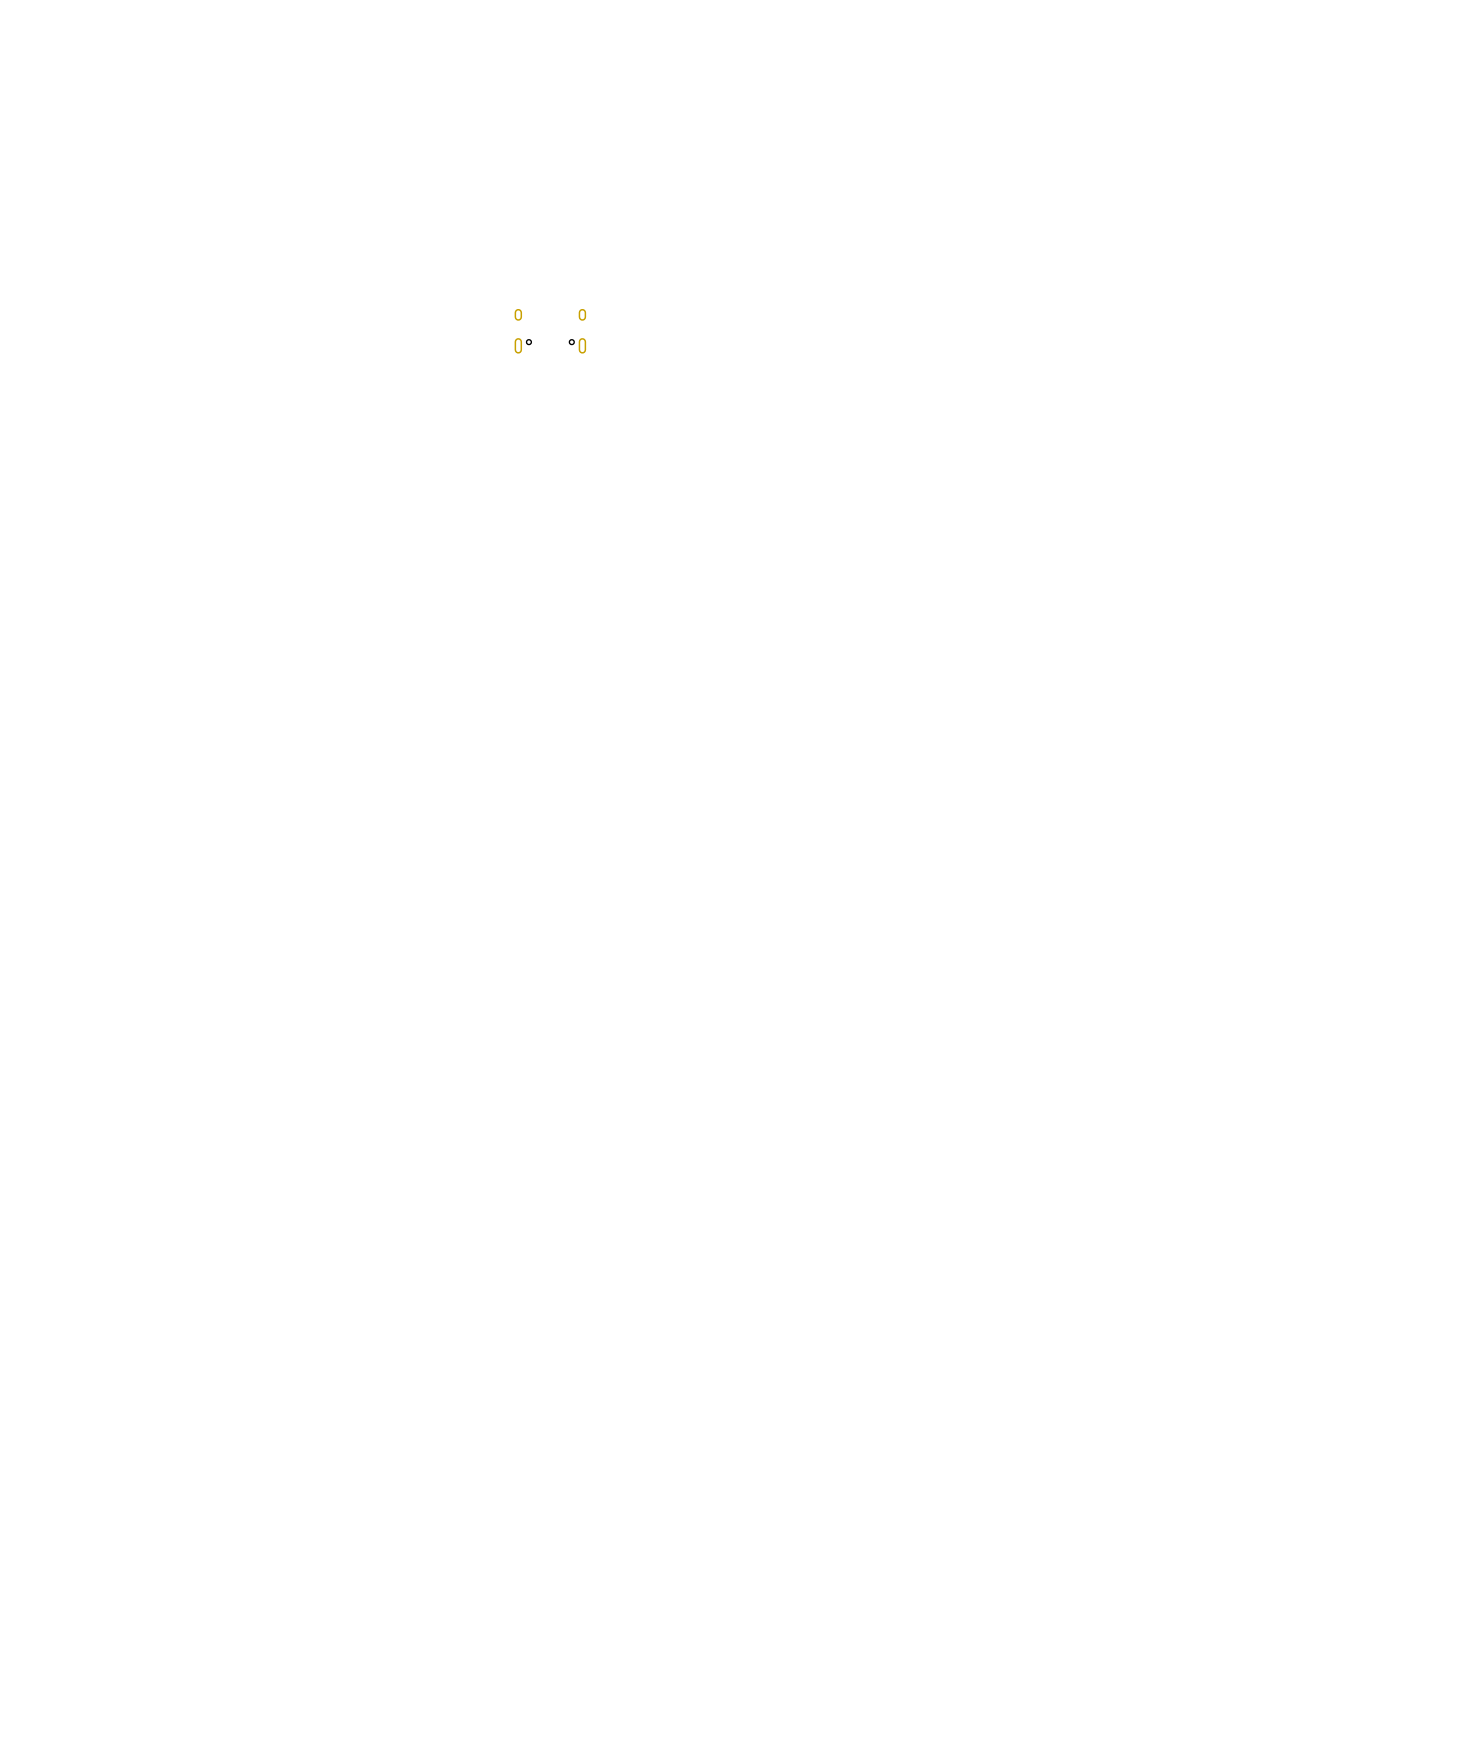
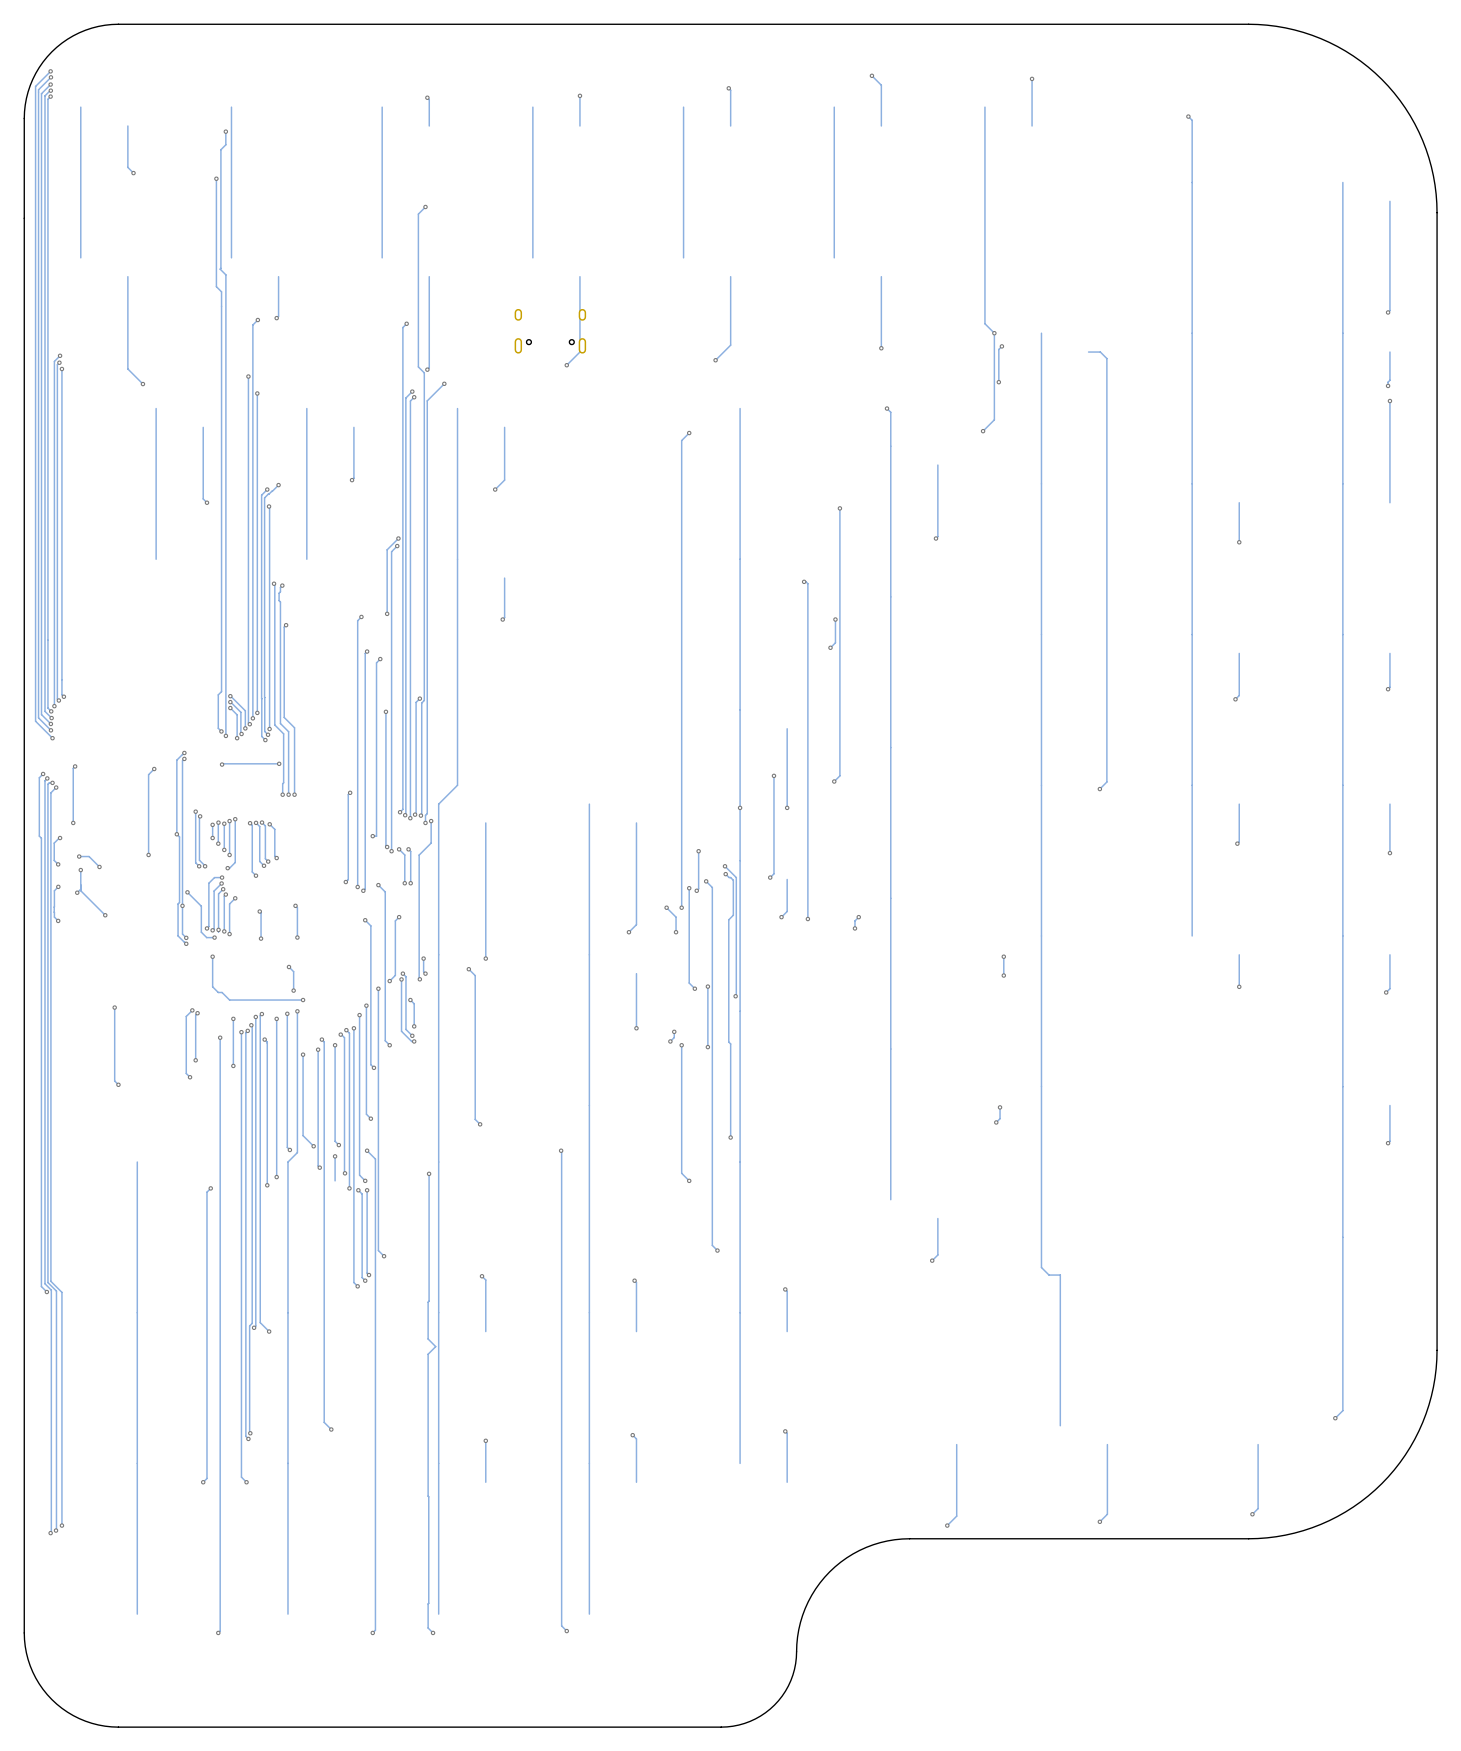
board edge: none -> (1248, 24) (118, 24) (98, 26) (79, 32) (56, 47) (43, 62) (30, 85) (24, 118) (24, 1632) (28, 1659) (35, 1678) (47, 1694) (62, 1708) (85, 1721) (118, 1727) (733, 1726) (760, 1716) (782, 1696) (792, 1675) (800, 1622) (811, 1595) (835, 1566) (866, 1547) (887, 1540) (909, 1538) (1248, 1538) (1276, 1536) (1312, 1527) (1345, 1511) (1375, 1489) (1399, 1462) (1414, 1439) (1426, 1413) (1433, 1387) (1436, 1359) (1436, 194) (1428, 157) (1414, 123) (1394, 93) (1375, 73) (1353, 56) (1320, 38) (1285, 27) (1248, 24)
track: none -> (50, 71) (35, 86) (35, 721) (52, 738)
via: none -> (50, 71)
track: none -> (871, 75) (881, 85) (881, 125)
via: none -> (871, 75)
track: none -> (50, 77) (38, 89) (38, 717) (50, 730)
via: none -> (50, 77)
track: none -> (1032, 78) (1032, 125)
via: none -> (1032, 78)
track: none -> (50, 84) (41, 93) (41, 714) (50, 723)
via: none -> (50, 84)
track: none -> (728, 88) (730, 90) (730, 125)
via: none -> (728, 88)
track: none -> (50, 90) (44, 95) (44, 711) (51, 718)
via: none -> (50, 90)
track: none -> (579, 95) (579, 125)
via: none -> (579, 95)
track: none -> (50, 96) (47, 99) (47, 708) (51, 711)
via: none -> (50, 96)
track: none -> (427, 97) (429, 99) (429, 125)
via: none -> (427, 97)
track: none -> (80, 107) (80, 257)
track: none -> (231, 107) (231, 257)
track: none -> (382, 107) (382, 257)
track: none -> (532, 107) (532, 257)
track: none -> (683, 107) (683, 257)
track: none -> (834, 107) (834, 257)
track: none -> (984, 107) (984, 323) (994, 333) (994, 419) (983, 431)
track: none -> (1188, 116) (1192, 120) (1192, 935)
via: none -> (1188, 116)
track: none -> (127, 125) (127, 167) (133, 173)
track: none -> (225, 131) (225, 144) (220, 149) (220, 269) (225, 274) (225, 735)
via: none -> (225, 131)
via: none -> (133, 173)
track: none -> (216, 178) (216, 286) (221, 291) (221, 691) (218, 694) (218, 728) (221, 731)
via: none -> (216, 178)
track: none -> (1342, 182) (1342, 1410) (1335, 1418)
track: none -> (1389, 201) (1389, 310) (1388, 312)
track: none -> (425, 206) (418, 214) (418, 366) (424, 372) (424, 700) (421, 703) (420, 815)
via: none -> (425, 206)
track: none -> (127, 276) (127, 368) (142, 384)
track: none -> (278, 276) (278, 316) (276, 318)
track: none -> (429, 276) (429, 367) (427, 369)
track: none -> (579, 276) (579, 352) (566, 365)
track: none -> (730, 276) (730, 345) (715, 360)
track: none -> (881, 276) (881, 348)
via: none -> (1388, 312)
via: none -> (276, 318)
track: none -> (257, 320) (252, 324) (252, 718)
via: none -> (257, 320)
track: none -> (406, 323) (402, 327) (402, 809) (400, 812)
via: none -> (406, 323)
via: none -> (994, 333)
track: none -> (1041, 333) (1041, 1267) (1049, 1275) (1060, 1275) (1060, 1425)
track: none -> (1001, 346) (998, 349) (998, 382)
via: none -> (1001, 346)
via: none -> (881, 348)
track: none -> (1088, 352) (1100, 352) (1106, 358) (1106, 782) (1099, 789)
track: none -> (1389, 352) (1389, 380) (1388, 385)
track: none -> (60, 355) (54, 361) (54, 706)
via: none -> (60, 355)
via: none -> (715, 360)
track: none -> (59, 362) (57, 364) (58, 700)
via: none -> (59, 362)
via: none -> (566, 365)
track: none -> (61, 368) (61, 694) (63, 696)
via: none -> (61, 368)
via: none -> (427, 369)
track: none -> (248, 376) (249, 724)
via: none -> (248, 376)
via: none -> (998, 382)
track: none -> (444, 383) (427, 400) (427, 813) (425, 822)
via: none -> (444, 383)
via: none -> (142, 384)
via: none -> (1388, 385)
track: none -> (412, 391) (405, 398) (405, 815)
via: none -> (412, 391)
track: none -> (257, 393) (257, 712)
via: none -> (257, 393)
track: none -> (414, 397) (410, 401) (410, 818)
via: none -> (414, 397)
track: none -> (1389, 401) (1389, 502)
via: none -> (1389, 401)
track: none -> (156, 408) (156, 559)
track: none -> (306, 408) (306, 559)
track: none -> (457, 408) (457, 785) (438, 804) (438, 1614)
track: none -> (740, 408) (740, 1463)
track: none -> (887, 408) (890, 412) (890, 1199)
via: none -> (887, 408)
track: none -> (203, 427) (203, 498) (206, 502)
track: none -> (353, 427) (353, 478) (352, 480)
track: none -> (504, 427) (504, 480) (495, 489)
via: none -> (983, 431)
track: none -> (689, 433) (681, 440) (681, 907)
via: none -> (689, 433)
track: none -> (937, 465) (937, 536) (935, 538)
via: none -> (352, 480)
track: none -> (278, 485) (264, 497) (264, 731) (268, 734)
via: none -> (278, 485)
track: none -> (267, 489) (261, 495) (261, 736) (265, 740)
via: none -> (267, 489)
via: none -> (495, 489)
via: none -> (206, 502)
track: none -> (1239, 502) (1239, 542)
track: none -> (269, 506) (269, 729)
via: none -> (269, 506)
track: none -> (839, 508) (839, 775) (834, 781)
via: none -> (839, 508)
track: none -> (398, 538) (387, 549) (387, 613)
via: none -> (398, 538)
via: none -> (935, 538)
via: none -> (1239, 542)
track: none -> (397, 546) (391, 551) (391, 851)
via: none -> (397, 546)
track: none -> (504, 578) (504, 617) (502, 619)
track: none -> (804, 581) (807, 583) (807, 919)
via: none -> (804, 581)
track: none -> (274, 583) (274, 725) (283, 733) (282, 794)
via: none -> (274, 583)
track: none -> (282, 585) (279, 593) (280, 723) (288, 731) (288, 794)
via: none -> (282, 585)
via: none -> (387, 613)
track: none -> (361, 616) (357, 620) (357, 887)
via: none -> (361, 616)
via: none -> (502, 619)
track: none -> (835, 619) (835, 642) (830, 647)
via: none -> (835, 619)
track: none -> (286, 625) (284, 627) (284, 717) (294, 727) (294, 794)
via: none -> (286, 625)
via: none -> (830, 647)
track: none -> (367, 651) (365, 653) (365, 888) (363, 890)
via: none -> (367, 651)
track: none -> (1239, 653) (1239, 695) (1235, 699)
track: none -> (1389, 653) (1389, 687) (1388, 689)
track: none -> (380, 659) (376, 662) (376, 836) (372, 836)
via: none -> (380, 659)
via: none -> (1388, 689)
via: none -> (63, 696)
track: none -> (230, 696) (245, 710) (245, 728)
via: none -> (230, 696)
track: none -> (419, 698) (416, 702) (415, 814)
via: none -> (419, 698)
via: none -> (1235, 699)
via: none -> (58, 700)
track: none -> (230, 702) (240, 712) (241, 734)
via: none -> (230, 702)
via: none -> (54, 706)
track: none -> (230, 708) (237, 714) (237, 738)
via: none -> (230, 708)
via: none -> (51, 711)
track: none -> (385, 711) (387, 847)
via: none -> (385, 711)
via: none -> (257, 712)
via: none -> (51, 718)
via: none -> (252, 718)
via: none -> (50, 723)
via: none -> (249, 724)
via: none -> (245, 728)
track: none -> (787, 728) (787, 807)
via: none -> (269, 729)
via: none -> (50, 730)
via: none -> (221, 731)
via: none -> (241, 734)
via: none -> (268, 734)
via: none -> (225, 735)
via: none -> (52, 738)
via: none -> (237, 738)
via: none -> (265, 740)
track: none -> (184, 752) (176, 760) (176, 834) (179, 836) (178, 935) (186, 943)
via: none -> (184, 752)
track: none -> (184, 758) (182, 760) (182, 934) (186, 937)
via: none -> (184, 758)
track: none -> (279, 763) (222, 764)
via: none -> (279, 763)
via: none -> (222, 764)
track: none -> (75, 766) (73, 768) (73, 822)
via: none -> (75, 766)
track: none -> (154, 769) (148, 774) (148, 854)
via: none -> (154, 769)
track: none -> (43, 773) (39, 777) (39, 836) (41, 838) (41, 1286) (46, 1292)
via: none -> (43, 773)
track: none -> (773, 775) (773, 873) (770, 877)
via: none -> (773, 775)
track: none -> (47, 778) (44, 780) (44, 1283) (51, 1290) (50, 1533)
via: none -> (47, 778)
via: none -> (834, 781)
track: none -> (52, 782) (47, 784) (47, 1282) (56, 1291) (56, 1530)
via: none -> (52, 782)
track: none -> (56, 787) (50, 792) (50, 1281) (61, 1292) (61, 1525)
via: none -> (56, 787)
via: none -> (1099, 789)
track: none -> (350, 792) (348, 794) (348, 879) (345, 882)
via: none -> (350, 792)
via: none -> (282, 794)
via: none -> (288, 794)
via: none -> (294, 794)
track: none -> (589, 804) (589, 1614)
track: none -> (1239, 804) (1239, 841) (1237, 843)
track: none -> (1389, 804) (1389, 853)
via: none -> (740, 807)
via: none -> (787, 807)
track: none -> (195, 811) (195, 862) (199, 866)
via: none -> (195, 811)
via: none -> (400, 812)
via: none -> (415, 814)
via: none -> (405, 815)
via: none -> (420, 815)
track: none -> (200, 816) (199, 860) (205, 866)
via: none -> (200, 816)
via: none -> (410, 818)
track: none -> (235, 819) (235, 862) (227, 868)
via: none -> (235, 819)
track: none -> (229, 821) (229, 854)
via: none -> (229, 821)
track: none -> (431, 821) (431, 843) (419, 855) (419, 979)
via: none -> (431, 821)
via: none -> (73, 822)
track: none -> (218, 822) (218, 843)
via: none -> (218, 822)
track: none -> (256, 822) (259, 826) (259, 861) (264, 865)
via: none -> (256, 822)
track: none -> (262, 822) (265, 825) (265, 858) (268, 861)
via: none -> (262, 822)
via: none -> (425, 822)
track: none -> (485, 822) (485, 958)
track: none -> (636, 822) (636, 924) (628, 932)
track: none -> (224, 823) (224, 849)
via: none -> (224, 823)
track: none -> (250, 823) (252, 825) (252, 872) (255, 875)
via: none -> (250, 823)
track: none -> (212, 824) (212, 838)
via: none -> (212, 824)
track: none -> (269, 824) (274, 829) (274, 856) (276, 858)
via: none -> (269, 824)
via: none -> (176, 834)
via: none -> (372, 836)
track: none -> (60, 838) (54, 843) (54, 860) (58, 864)
via: none -> (60, 838)
via: none -> (212, 838)
via: none -> (218, 843)
via: none -> (1237, 843)
via: none -> (387, 847)
via: none -> (224, 849)
track: none -> (399, 849) (404, 854) (404, 883)
via: none -> (399, 849)
track: none -> (408, 849) (410, 851) (410, 883)
via: none -> (408, 849)
via: none -> (391, 851)
track: none -> (698, 851) (698, 888) (696, 890)
via: none -> (698, 851)
via: none -> (1389, 853)
via: none -> (148, 854)
via: none -> (229, 854)
track: none -> (79, 856) (89, 856) (99, 866)
via: none -> (79, 856)
via: none -> (276, 858)
via: none -> (268, 861)
via: none -> (58, 864)
via: none -> (264, 865)
via: none -> (99, 866)
via: none -> (199, 866)
via: none -> (205, 866)
track: none -> (725, 866) (736, 877) (735, 996)
via: none -> (725, 866)
via: none -> (227, 868)
track: none -> (80, 870) (80, 890) (105, 915)
via: none -> (80, 870)
track: none -> (725, 874) (733, 880) (733, 915) (728, 919) (730, 1137)
via: none -> (725, 874)
via: none -> (255, 875)
track: none -> (222, 877) (214, 877) (208, 883) (208, 926) (206, 928)
via: none -> (222, 877)
via: none -> (770, 877)
track: none -> (787, 879) (787, 911) (781, 917)
track: none -> (706, 881) (712, 887) (712, 1245) (717, 1250)
via: none -> (706, 881)
via: none -> (345, 882)
track: none -> (221, 883) (214, 891) (212, 930)
via: none -> (221, 883)
via: none -> (404, 883)
via: none -> (410, 883)
track: none -> (378, 885) (385, 891) (385, 1040) (389, 1045)
via: none -> (378, 885)
track: none -> (58, 886) (54, 890) (54, 907) (54, 917) (58, 920)
via: none -> (58, 886)
via: none -> (357, 887)
track: none -> (689, 888) (689, 983) (694, 988)
via: none -> (689, 888)
track: none -> (80, 889) (77, 892)
track: none -> (223, 889) (218, 893) (218, 931)
via: none -> (223, 889)
via: none -> (363, 890)
via: none -> (696, 890)
via: none -> (77, 892)
track: none -> (187, 892) (201, 906) (201, 932) (206, 937) (214, 937)
via: none -> (187, 892)
track: none -> (225, 894) (224, 931)
via: none -> (225, 894)
track: none -> (235, 898) (229, 903) (229, 934)
via: none -> (235, 898)
via: none -> (182, 905)
track: none -> (295, 905) (297, 907) (297, 937)
via: none -> (295, 905)
track: none -> (666, 907) (676, 917) (676, 932)
via: none -> (666, 907)
via: none -> (681, 907)
track: none -> (259, 911) (261, 938)
via: none -> (259, 911)
via: none -> (105, 915)
track: none -> (399, 917) (395, 920) (395, 975) (389, 981)
via: none -> (399, 917)
via: none -> (781, 917)
track: none -> (858, 917) (854, 920) (854, 928)
via: none -> (858, 917)
via: none -> (807, 919)
via: none -> (58, 920)
track: none -> (365, 920) (370, 925) (370, 1064) (373, 1067)
via: none -> (365, 920)
via: none -> (206, 928)
via: none -> (854, 928)
via: none -> (218, 929)
via: none -> (212, 930)
via: none -> (224, 931)
via: none -> (628, 932)
via: none -> (676, 932)
via: none -> (229, 934)
via: none -> (186, 937)
via: none -> (214, 937)
via: none -> (297, 937)
via: none -> (261, 938)
via: none -> (186, 943)
track: none -> (1239, 954) (1239, 986)
track: none -> (1389, 954) (1389, 988) (1386, 992)
track: none -> (212, 956) (212, 986) (229, 1000) (303, 1000)
via: none -> (212, 956)
track: none -> (1003, 956) (1003, 975)
via: none -> (1003, 956)
track: none -> (423, 958) (423, 971) (425, 973)
via: none -> (423, 958)
via: none -> (485, 958)
track: none -> (288, 967) (293, 971) (293, 990)
via: none -> (288, 967)
track: none -> (468, 969) (475, 975) (475, 1119) (480, 1124)
via: none -> (468, 969)
track: none -> (402, 973) (405, 976) (405, 1029) (412, 1035)
via: none -> (402, 973)
via: none -> (425, 973)
track: none -> (636, 973) (636, 1028)
via: none -> (1003, 975)
track: none -> (401, 979) (401, 1031) (411, 1041) (414, 1041)
via: none -> (401, 979)
via: none -> (419, 979)
via: none -> (389, 981)
track: none -> (707, 986) (707, 1047)
via: none -> (707, 986)
via: none -> (1239, 986)
track: none -> (378, 988) (378, 1250) (384, 1256)
via: none -> (378, 988)
via: none -> (694, 988)
via: none -> (293, 990)
via: none -> (1386, 992)
via: none -> (735, 996)
via: none -> (303, 1000)
track: none -> (410, 1000) (414, 1003) (414, 1026)
via: none -> (410, 1000)
track: none -> (366, 1005) (366, 1114) (370, 1118)
via: none -> (366, 1005)
track: none -> (114, 1007) (114, 1081) (118, 1084)
via: none -> (114, 1007)
track: none -> (192, 1010) (186, 1016) (186, 1073) (190, 1077)
via: none -> (192, 1010)
track: none -> (297, 1011) (297, 1152) (287, 1162) (287, 1614)
via: none -> (297, 1011)
track: none -> (197, 1013) (195, 1015) (195, 1060)
via: none -> (197, 1013)
track: none -> (287, 1013) (287, 1147) (289, 1149)
via: none -> (287, 1013)
track: none -> (261, 1014) (260, 1015) (260, 1322) (269, 1331)
via: none -> (261, 1014)
track: none -> (359, 1015) (359, 1175) (365, 1180)
via: none -> (359, 1015)
track: none -> (255, 1016) (255, 1326) (254, 1327)
via: none -> (255, 1016)
track: none -> (233, 1018) (233, 1065)
via: none -> (233, 1018)
track: none -> (276, 1018) (276, 1177)
via: none -> (276, 1018)
track: none -> (251, 1025) (252, 1323) (249, 1325) (250, 1433)
via: none -> (251, 1025)
via: none -> (414, 1026)
track: none -> (353, 1028) (353, 1282) (357, 1286)
via: none -> (353, 1028)
via: none -> (636, 1028)
track: none -> (247, 1030) (245, 1032) (245, 1436) (248, 1438)
via: none -> (247, 1030)
track: none -> (346, 1030) (349, 1033) (349, 1188)
via: none -> (346, 1030)
track: none -> (674, 1031) (674, 1037) (670, 1041)
via: none -> (674, 1031)
track: none -> (241, 1032) (241, 1477) (246, 1482)
via: none -> (241, 1032)
track: none -> (340, 1034) (344, 1037) (345, 1173)
via: none -> (340, 1034)
via: none -> (412, 1035)
track: none -> (220, 1037) (220, 1631) (218, 1632)
via: none -> (220, 1037)
track: none -> (264, 1039) (267, 1042) (267, 1185)
via: none -> (264, 1039)
track: none -> (321, 1039) (324, 1041) (324, 1422) (331, 1429)
via: none -> (321, 1039)
via: none -> (414, 1041)
via: none -> (670, 1041)
track: none -> (335, 1045) (335, 1141) (338, 1145)
via: none -> (335, 1045)
via: none -> (389, 1045)
track: none -> (681, 1045) (681, 1173) (689, 1180)
via: none -> (681, 1045)
via: none -> (707, 1047)
track: none -> (318, 1049) (318, 1166) (319, 1167)
via: none -> (318, 1049)
track: none -> (303, 1054) (303, 1135) (313, 1146)
via: none -> (303, 1054)
via: none -> (195, 1060)
via: none -> (233, 1065)
via: none -> (373, 1067)
via: none -> (190, 1077)
via: none -> (118, 1084)
track: none -> (1389, 1105) (1389, 1141) (1388, 1143)
track: none -> (1000, 1107) (1000, 1118) (996, 1122)
via: none -> (1000, 1107)
via: none -> (370, 1118)
via: none -> (996, 1122)
via: none -> (480, 1124)
via: none -> (730, 1137)
via: none -> (1388, 1143)
via: none -> (338, 1145)
via: none -> (313, 1146)
via: none -> (289, 1149)
track: none -> (367, 1150) (375, 1159) (375, 1630) (372, 1632)
via: none -> (367, 1150)
track: none -> (561, 1150) (561, 1625) (566, 1631)
via: none -> (561, 1150)
track: none -> (335, 1156) (335, 1180)
via: none -> (335, 1156)
track: none -> (137, 1162) (137, 1614)
via: none -> (319, 1167)
via: none -> (345, 1173)
track: none -> (429, 1173) (428, 1339) (435, 1346) (428, 1354) (428, 1628) (433, 1632)
via: none -> (429, 1173)
via: none -> (276, 1177)
via: none -> (365, 1180)
via: none -> (689, 1180)
via: none -> (267, 1185)
track: none -> (210, 1188) (206, 1192) (206, 1478) (203, 1482)
via: none -> (210, 1188)
via: none -> (349, 1188)
track: none -> (358, 1190) (362, 1194) (362, 1277) (365, 1280)
via: none -> (358, 1190)
track: none -> (367, 1190) (367, 1273) (368, 1275)
via: none -> (367, 1190)
track: none -> (937, 1218) (937, 1255) (932, 1260)
via: none -> (717, 1250)
via: none -> (384, 1256)
via: none -> (932, 1260)
via: none -> (368, 1275)
track: none -> (482, 1276) (485, 1280) (485, 1331)
via: none -> (482, 1276)
via: none -> (365, 1280)
track: none -> (634, 1280) (636, 1282) (636, 1331)
via: none -> (634, 1280)
via: none -> (357, 1286)
track: none -> (785, 1289) (787, 1291) (787, 1331)
via: none -> (785, 1289)
via: none -> (46, 1292)
via: none -> (254, 1327)
via: none -> (269, 1331)
via: none -> (1335, 1418)
via: none -> (331, 1429)
track: none -> (785, 1431) (787, 1433) (787, 1482)
via: none -> (785, 1431)
via: none -> (250, 1433)
track: none -> (632, 1435) (636, 1438) (636, 1482)
via: none -> (632, 1435)
via: none -> (248, 1438)
track: none -> (485, 1440) (485, 1482)
via: none -> (485, 1440)
track: none -> (956, 1444) (956, 1516) (947, 1525)
track: none -> (1107, 1444) (1107, 1514) (1099, 1521)
track: none -> (1258, 1444) (1258, 1508) (1252, 1514)
via: none -> (203, 1482)
via: none -> (246, 1482)
via: none -> (1252, 1514)
via: none -> (1099, 1521)
via: none -> (61, 1525)
via: none -> (947, 1525)
via: none -> (56, 1530)
via: none -> (50, 1533)
via: none -> (566, 1631)
via: none -> (218, 1632)
via: none -> (372, 1632)
via: none -> (433, 1632)

